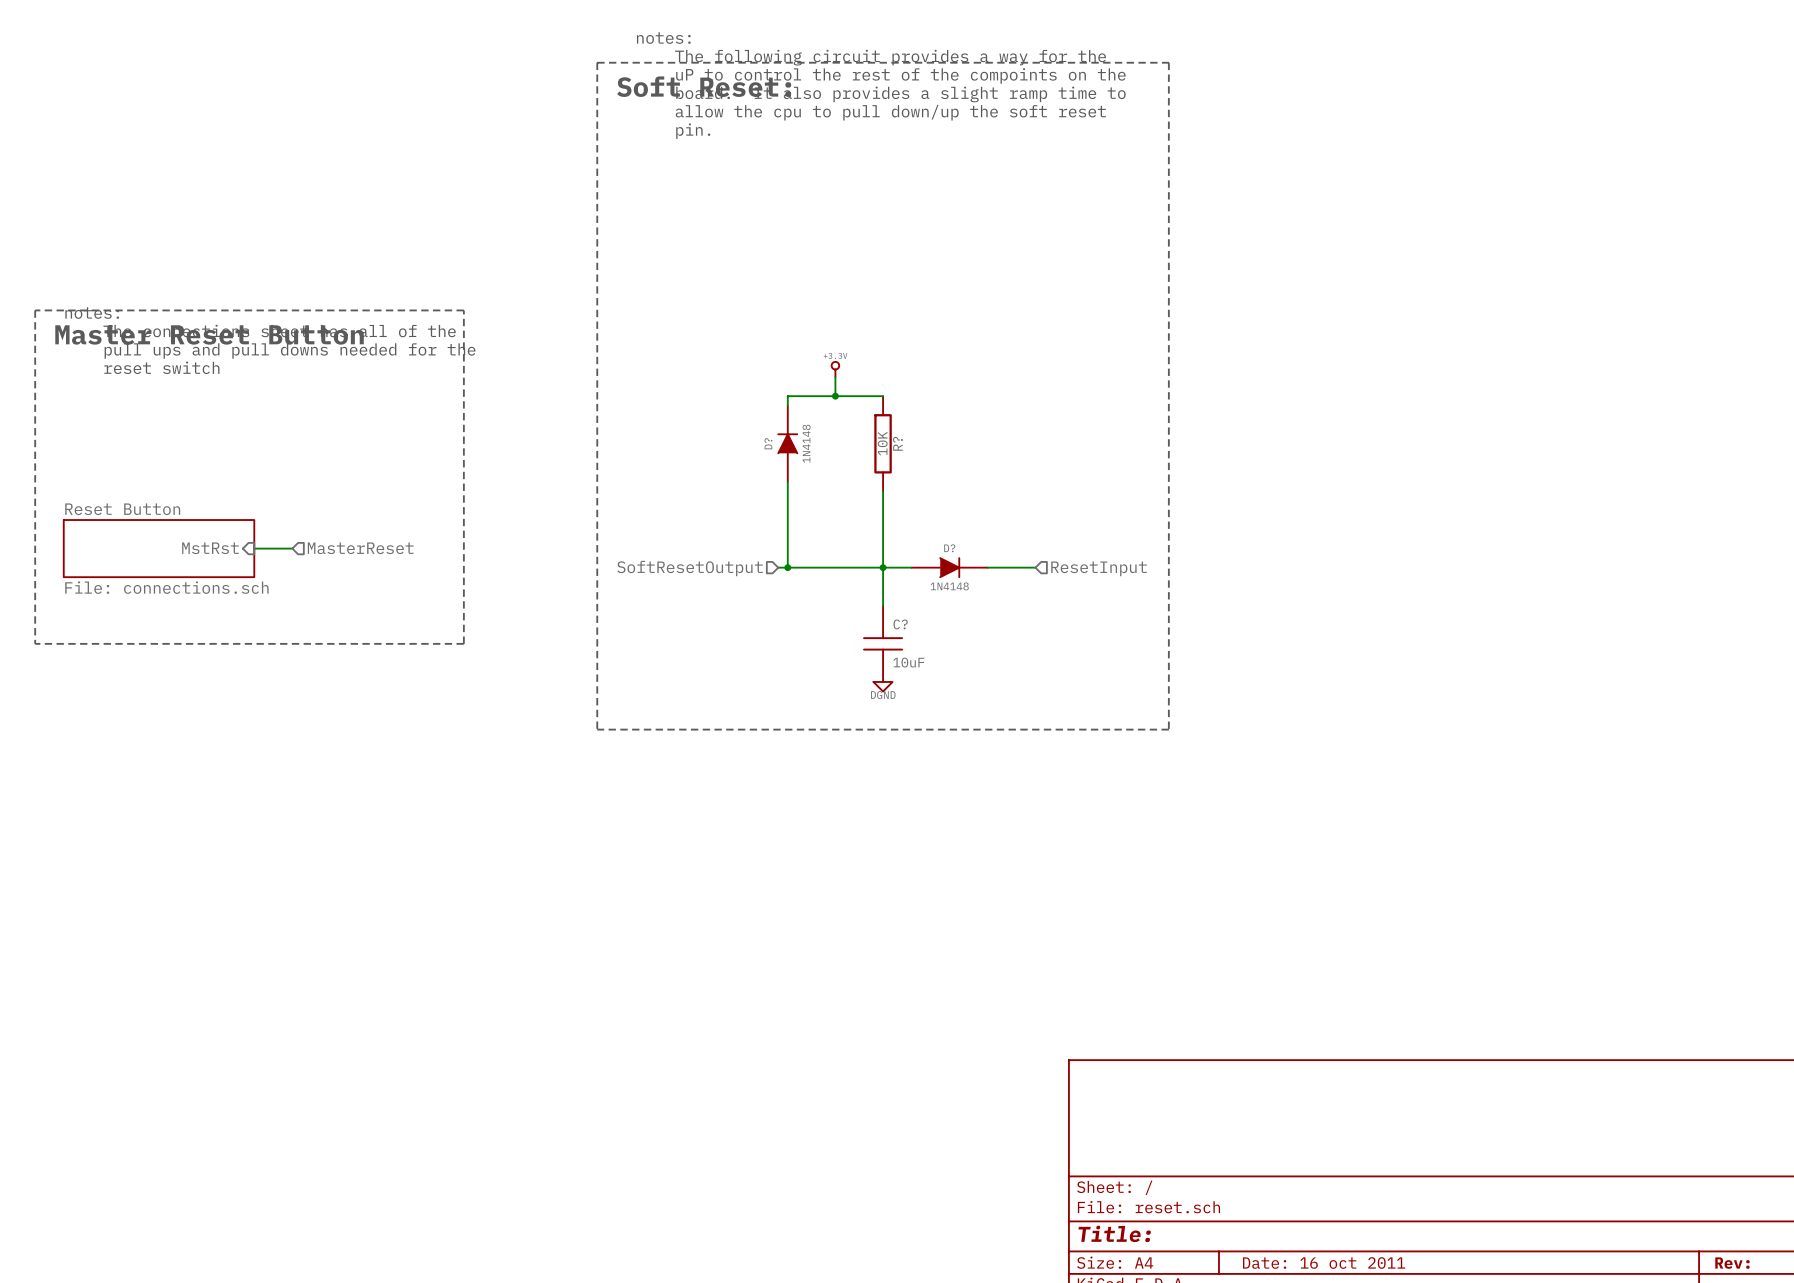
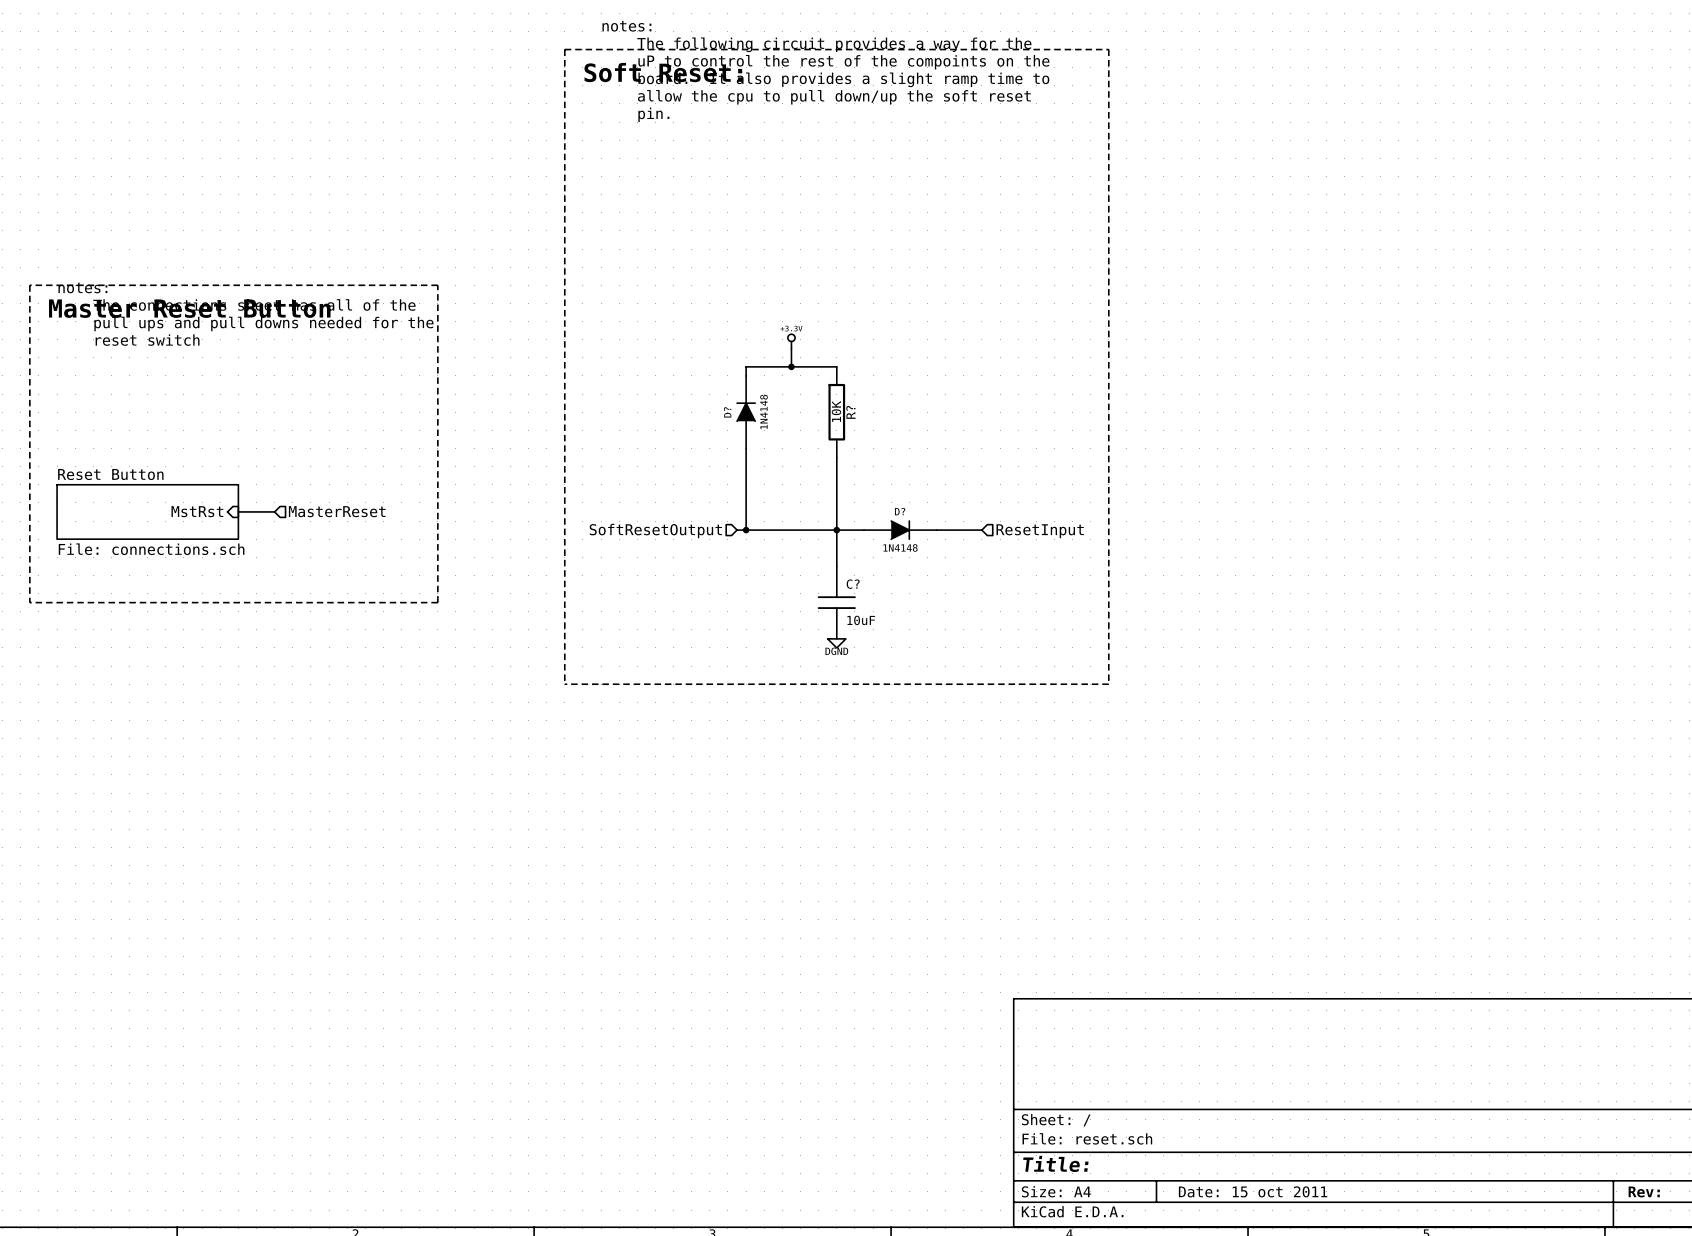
title block: Date: 16 oct 2011 (1324, 1262) -> Date: 15 oct 2011 (1253, 1191)

